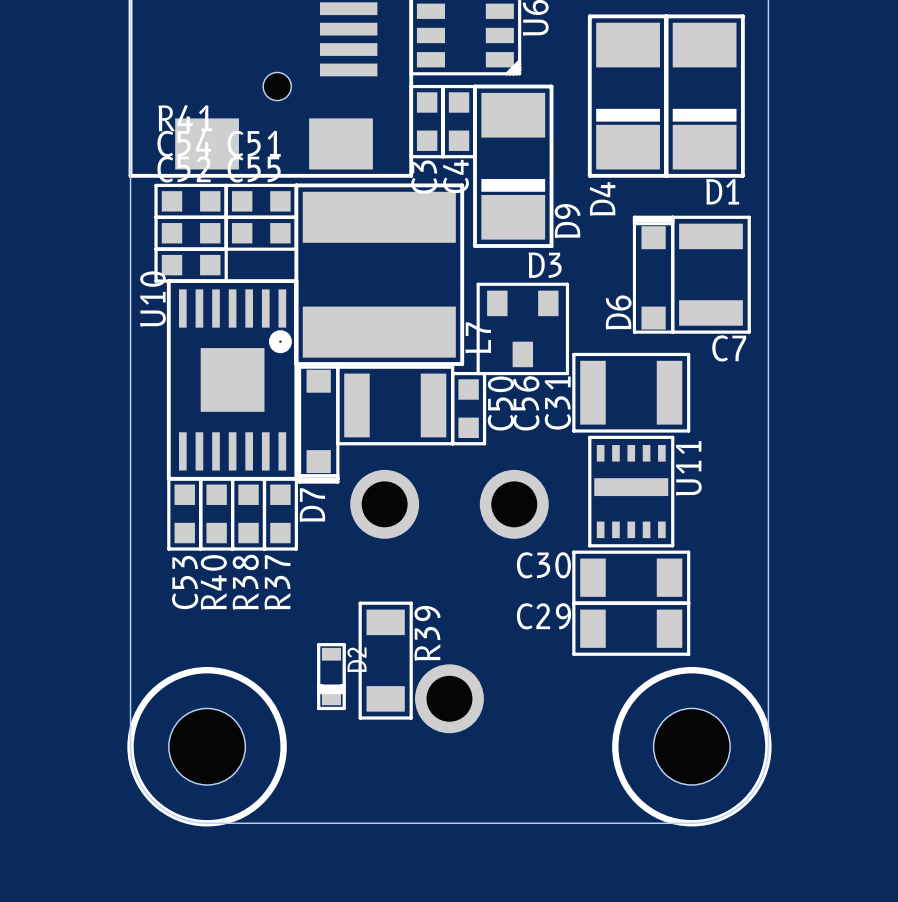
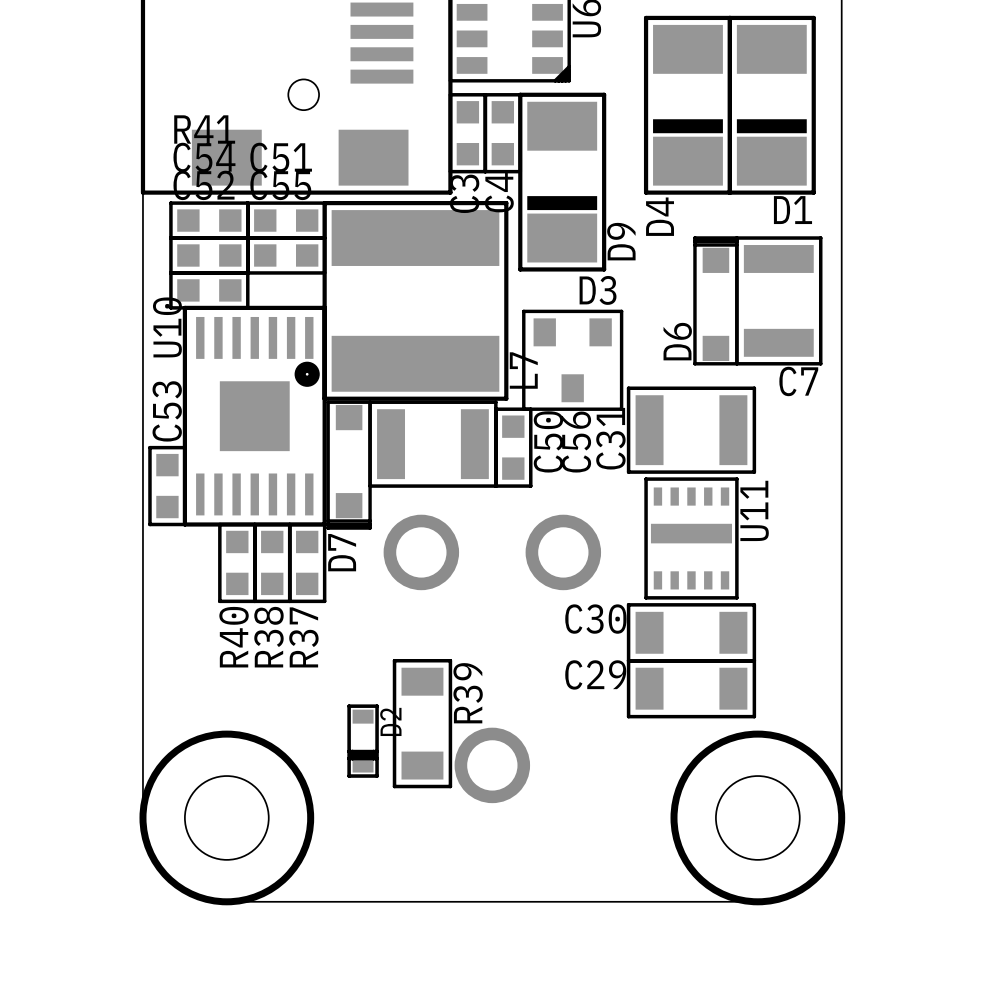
C53 position: (184, 513) -> (167, 486)
C53 name position: C53 (185, 582) -> C53 (167, 411)

